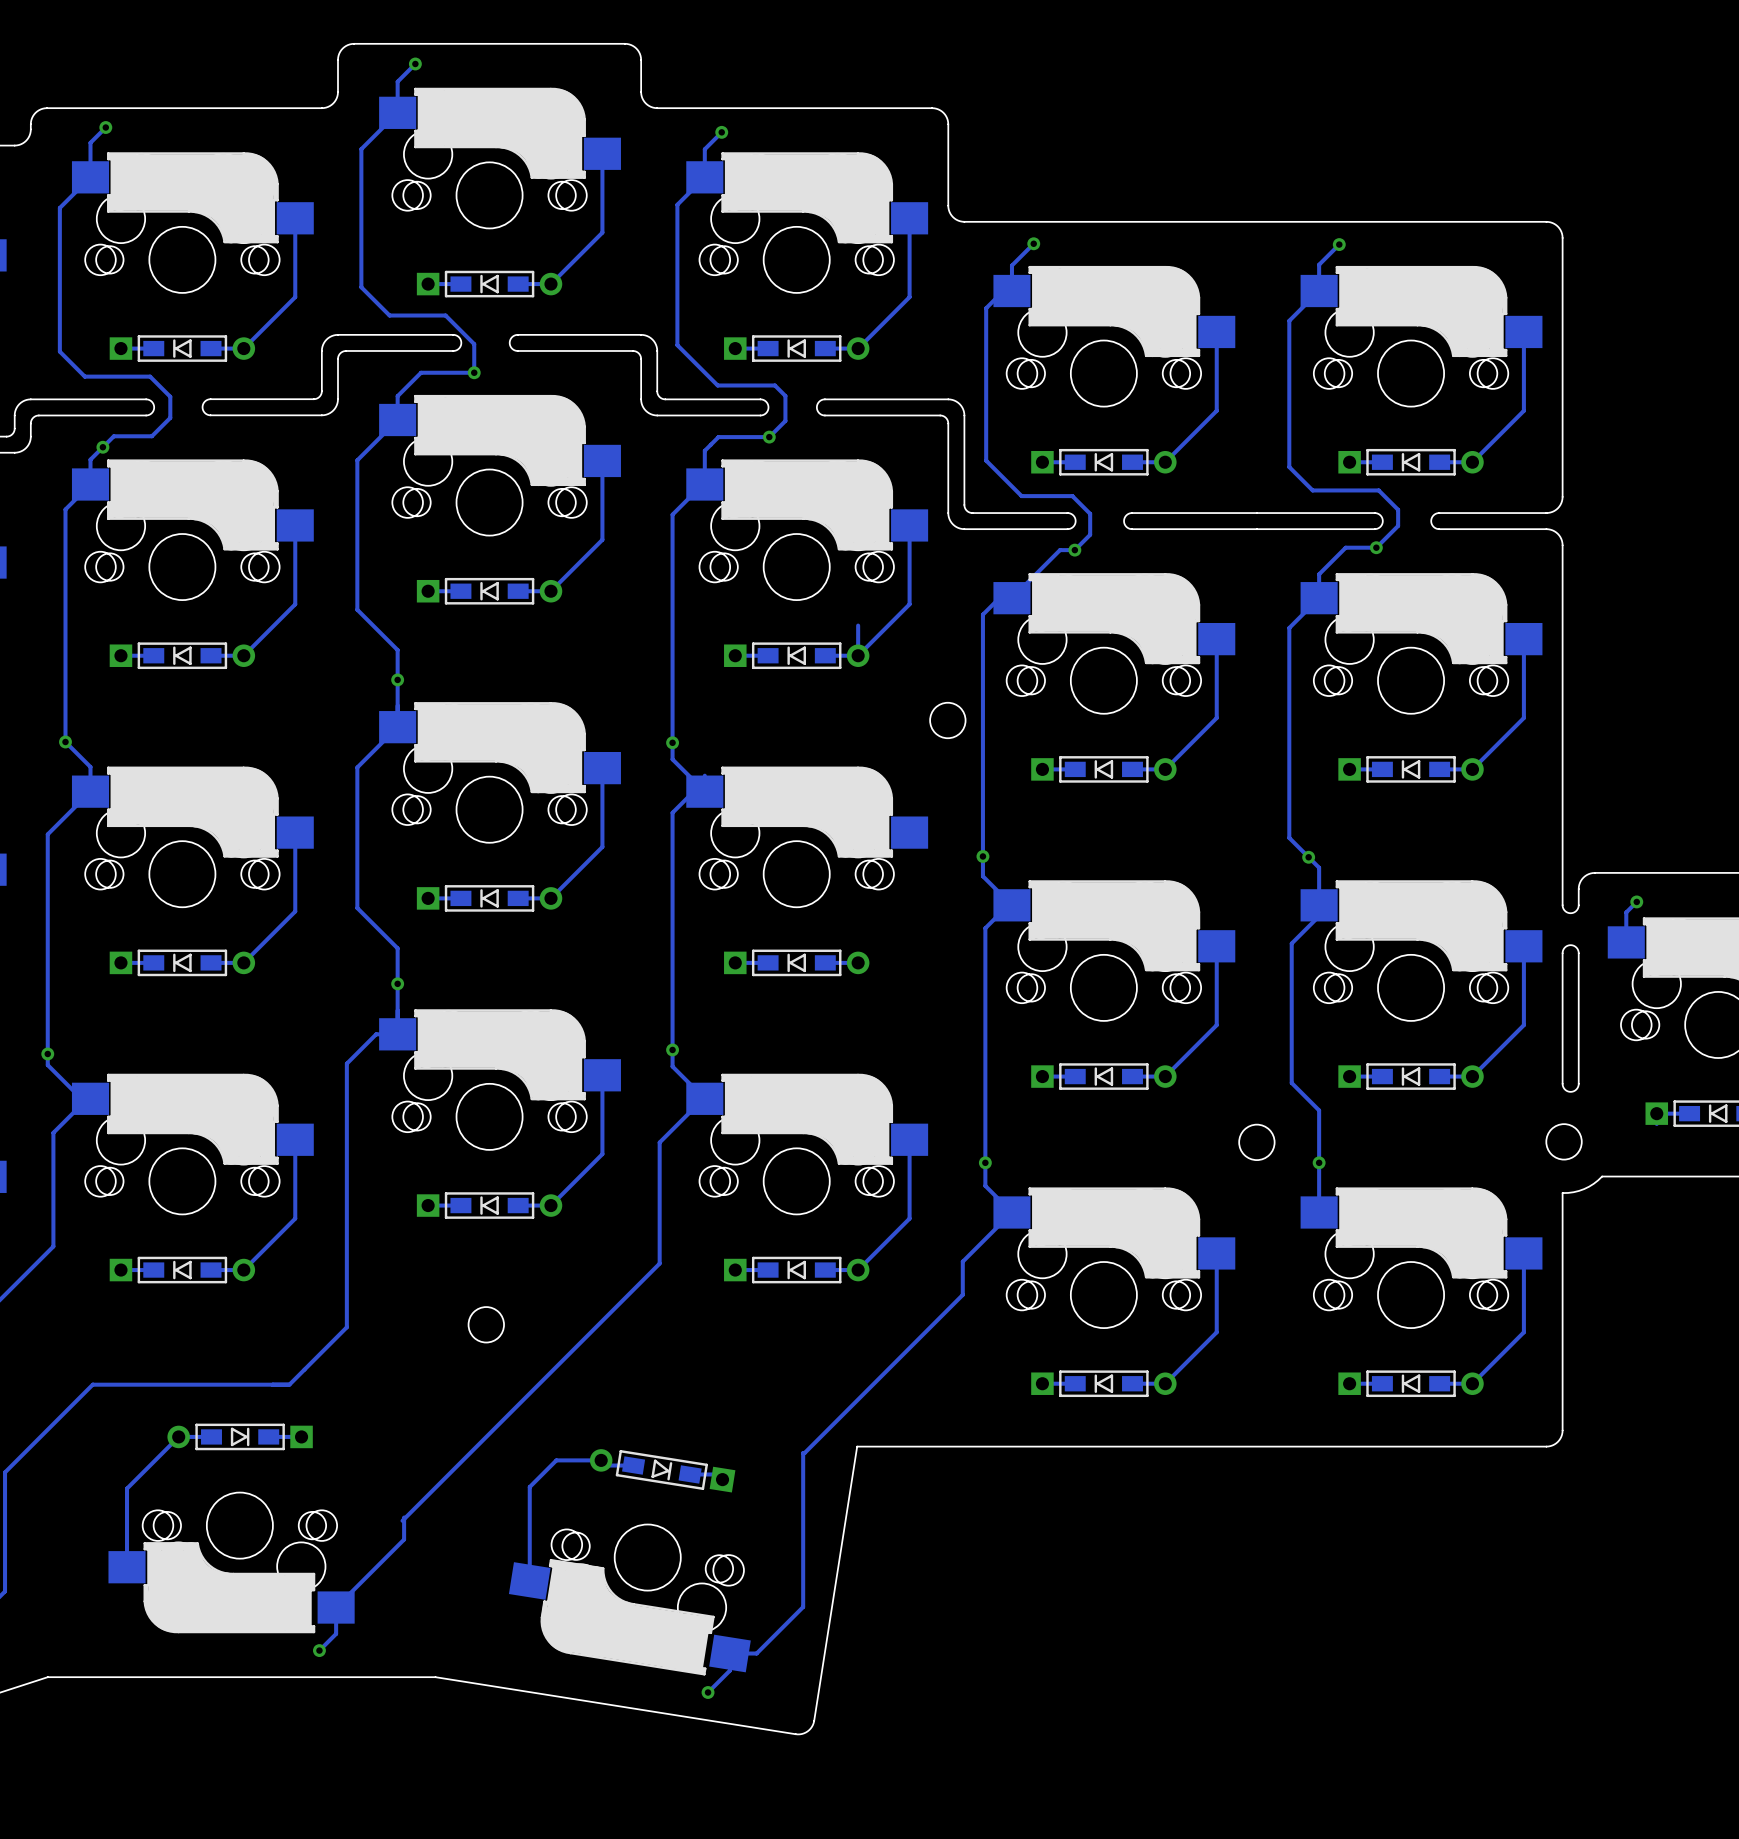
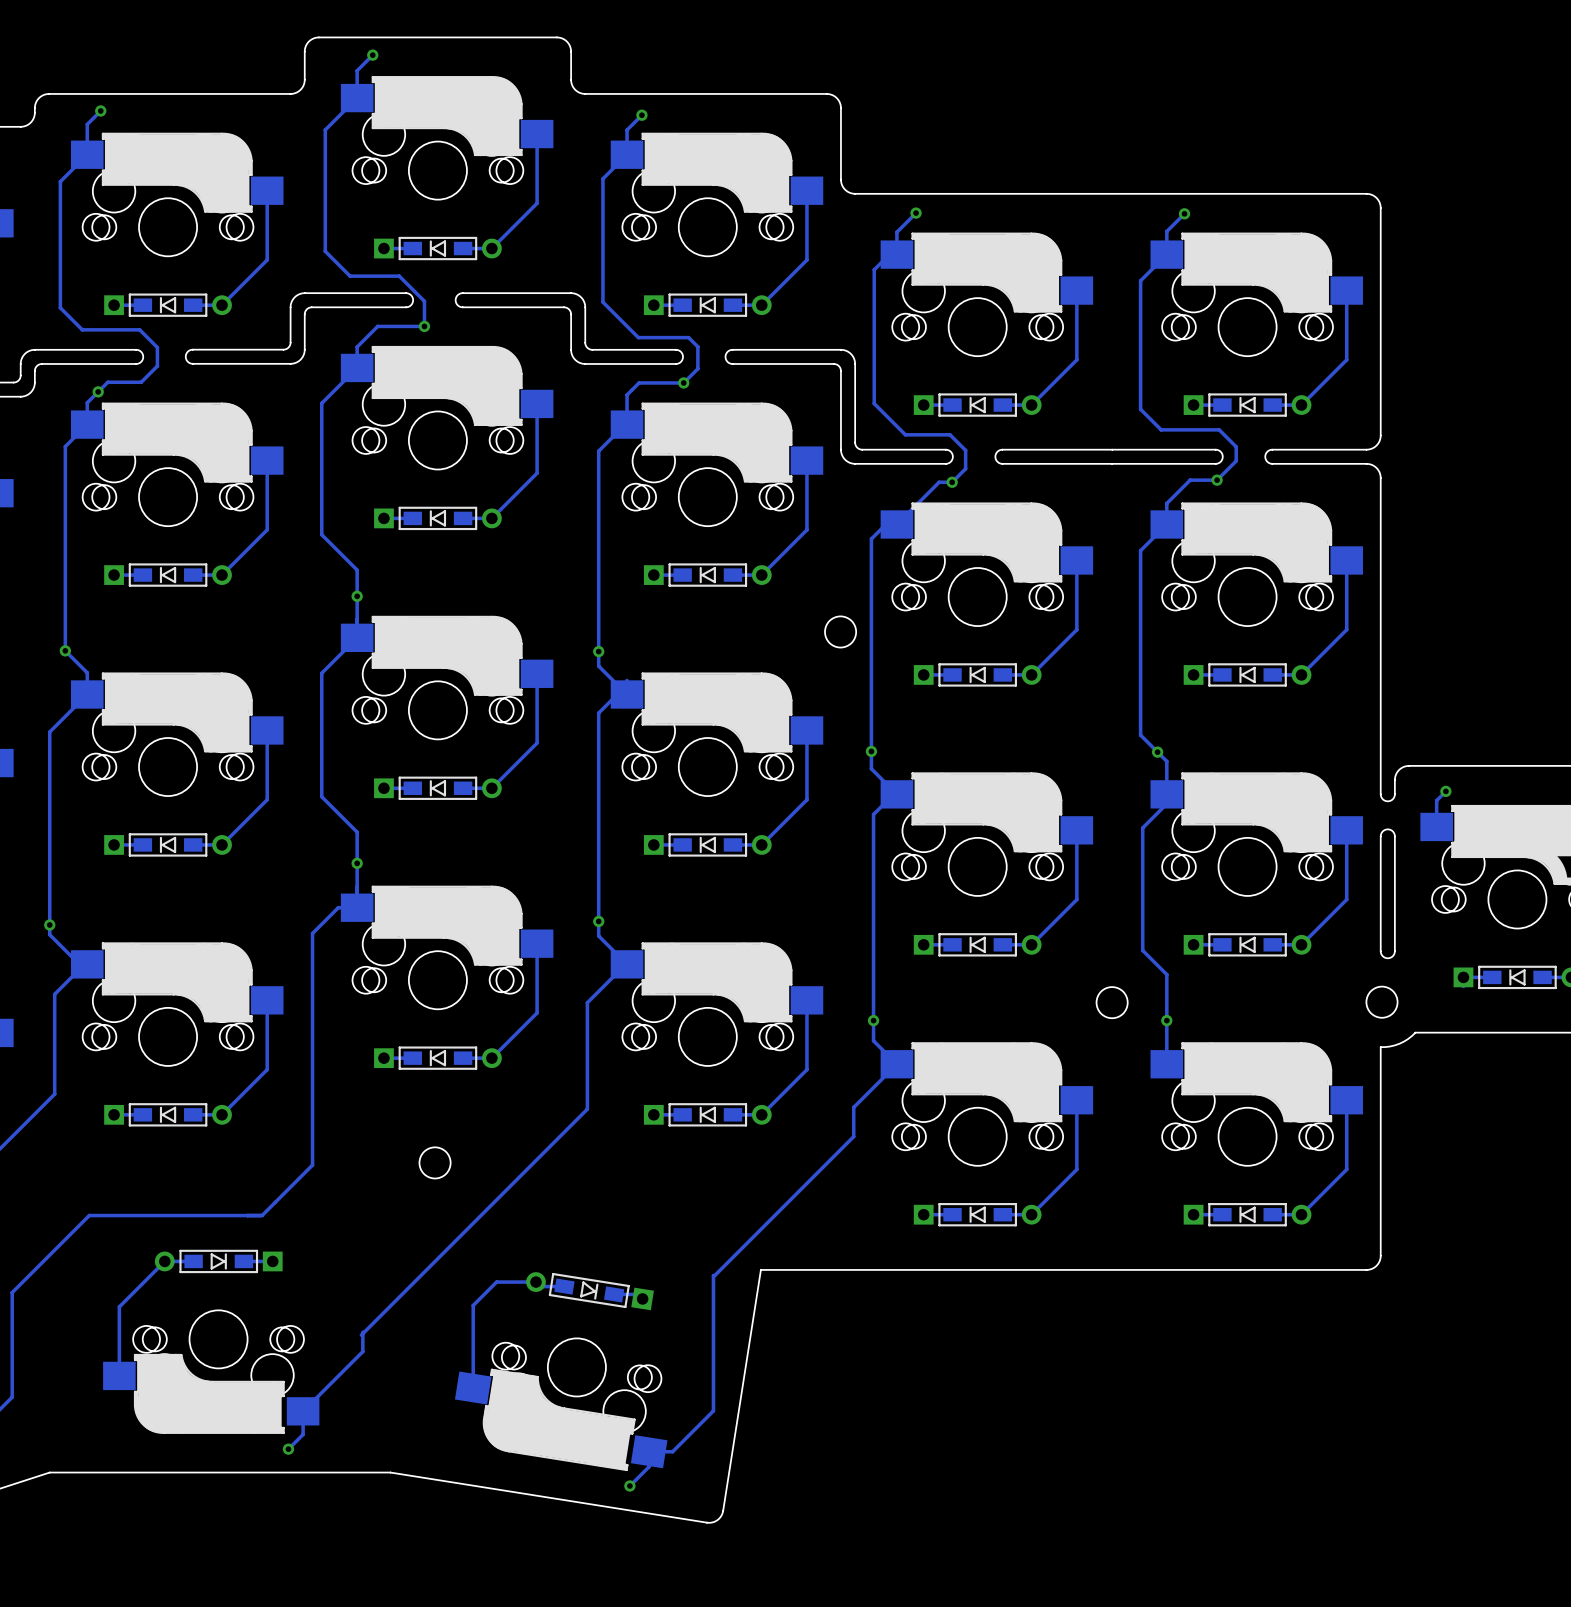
track: (858, 625) (858, 655) -> none
track: none -> (806, 730) (806, 799) (761, 844)

